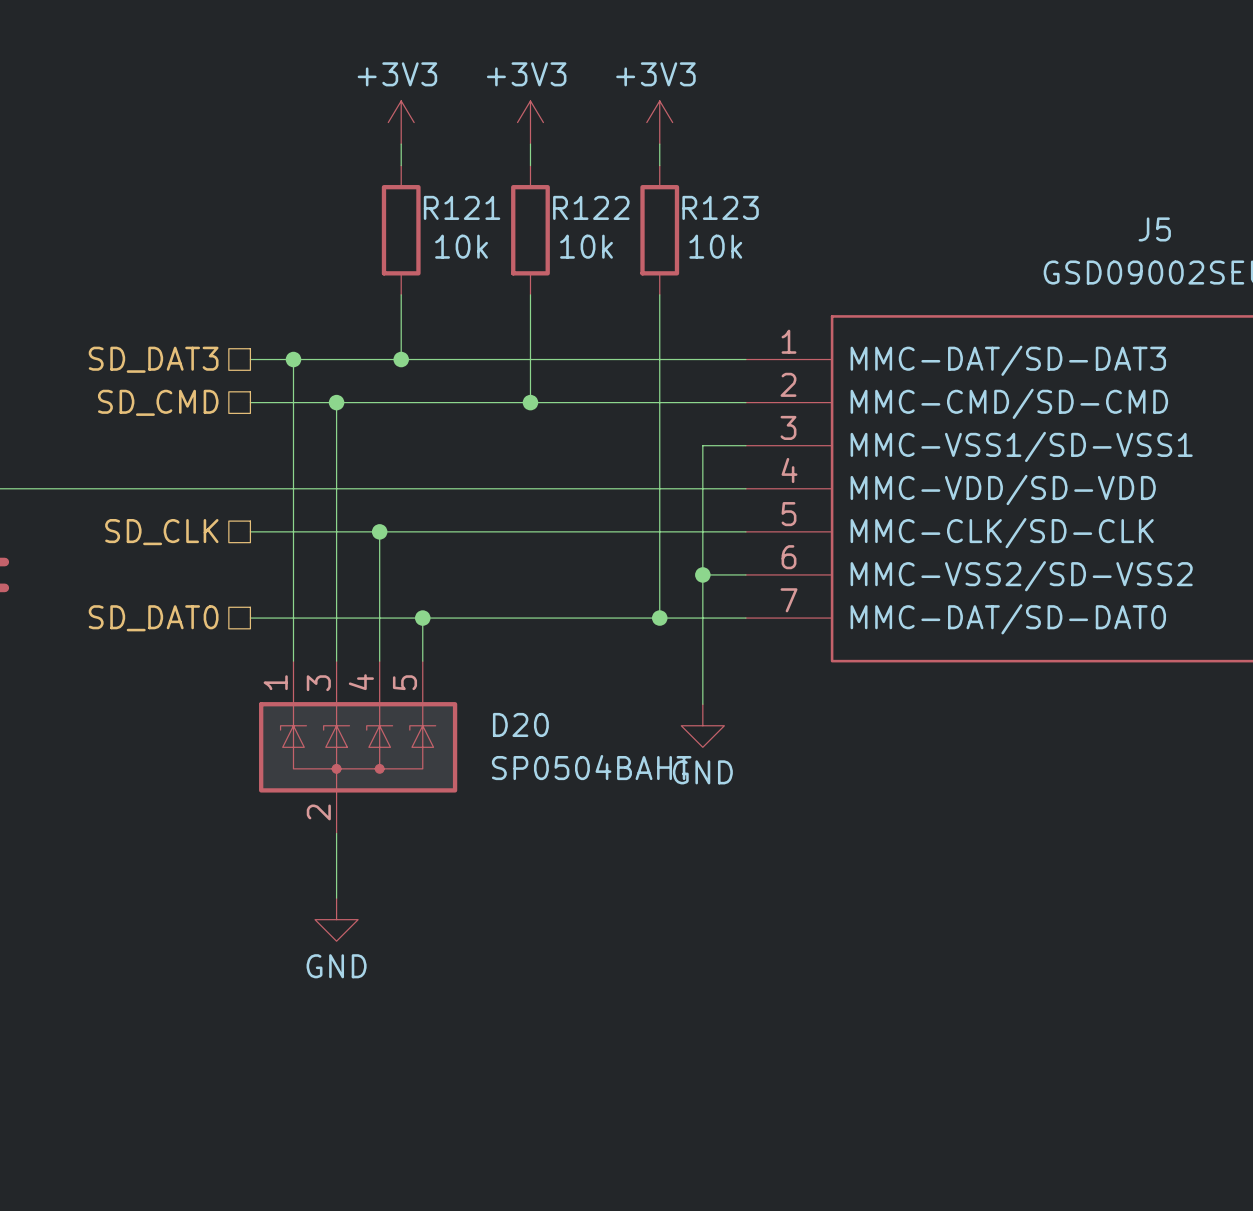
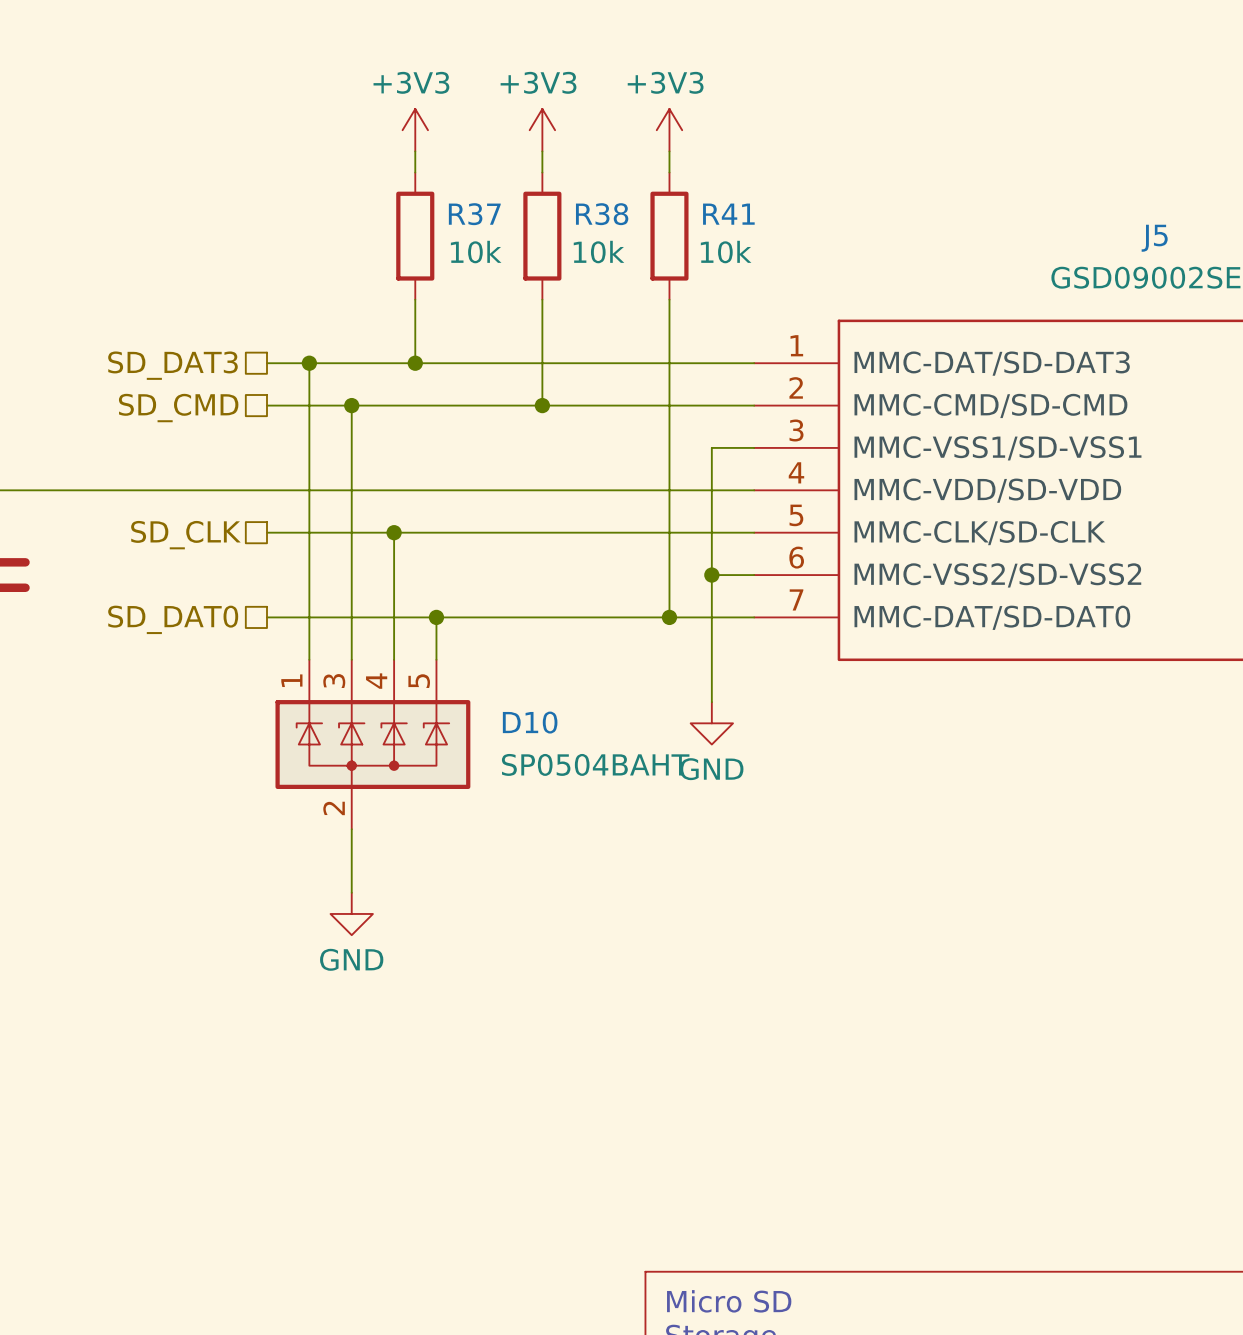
R121 name: R121 (462, 207) -> R37 (474, 214)
R122 name: R122 (591, 207) -> R38 (602, 214)
R123 name: R123 (720, 207) -> R41 (728, 214)
D20 name: D20 (520, 724) -> D10 (530, 722)

